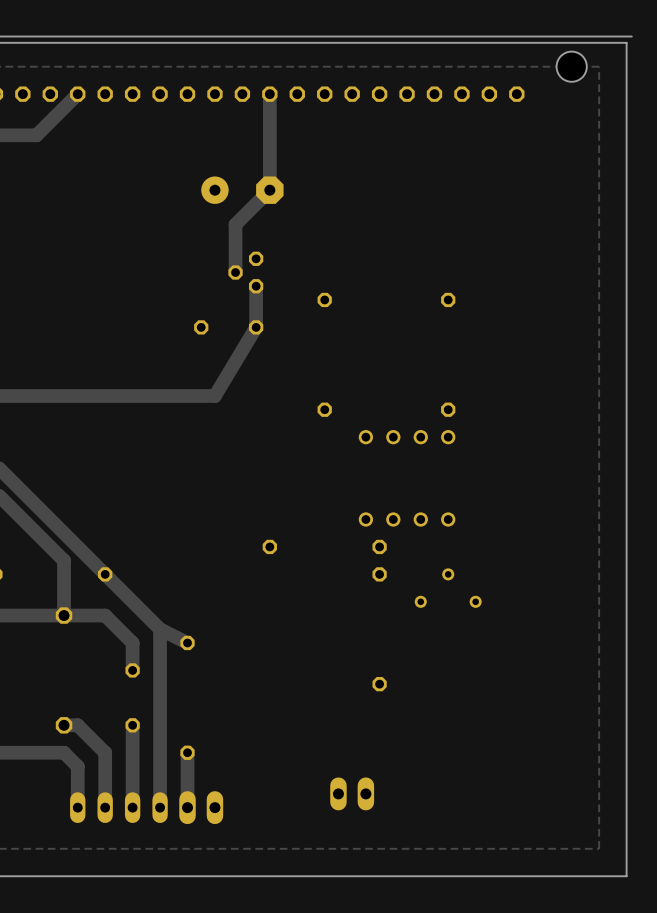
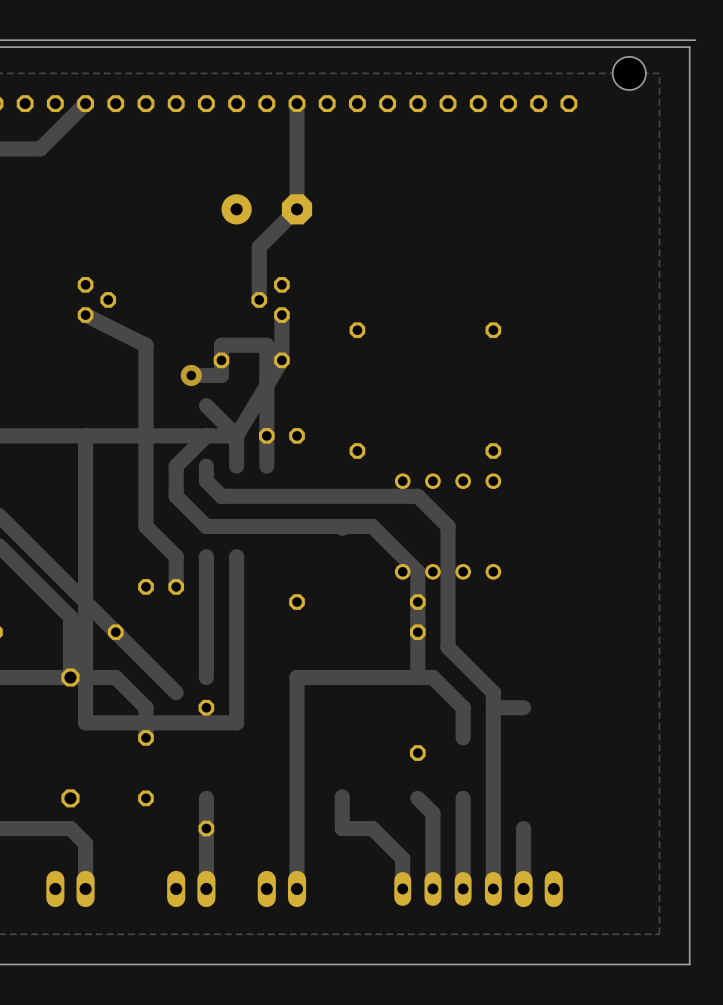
part: none -> (96, 299)
track: none -> (85, 315) (145, 345) (145, 526) (176, 556) (176, 586)
track: none -> (191, 375) (221, 375) (221, 345) (266, 345) (266, 466)
via: none -> (191, 375)
track: none -> (206, 405) (236, 435) (236, 466)
track: none -> (85, 435) (85, 722) (236, 722) (236, 556)
track: none -> (206, 435) (176, 466) (176, 496) (206, 526) (342, 528) (372, 526) (417, 571) (417, 677)
part: none -> (281, 435)
track: none -> (206, 466) (206, 481) (221, 496) (417, 496) (448, 526) (448, 647) (493, 692) (493, 888)
track: none -> (206, 556) (206, 677)
part: none -> (161, 586)
part: (448, 588) -> none
track: (187, 642) (160, 629) (160, 807) -> none
track: none -> (523, 707) (493, 707)
track: none -> (463, 737) (463, 707) (432, 677) (297, 677) (297, 888)
track: none -> (342, 796) (342, 828) (372, 828) (402, 858) (402, 888)
track: (64, 725) (77, 725) (105, 752) (105, 807) -> none
track: (132, 725) (132, 807) -> none
track: none -> (206, 798) (206, 828)
track: none -> (417, 798) (432, 813) (432, 888)
track: none -> (463, 798) (463, 888)
track: none -> (523, 828) (523, 888)
part: (352, 793) -> none
part: none -> (70, 888)
part: (118, 807) -> none
part: none -> (191, 888)
part: (201, 807) -> none
part: none -> (281, 888)
part: none -> (448, 888)
part: none -> (538, 888)

